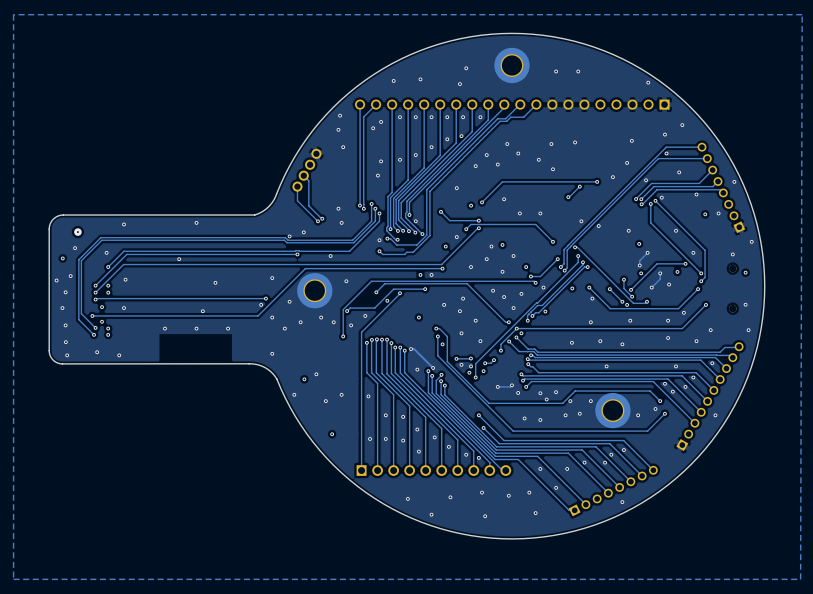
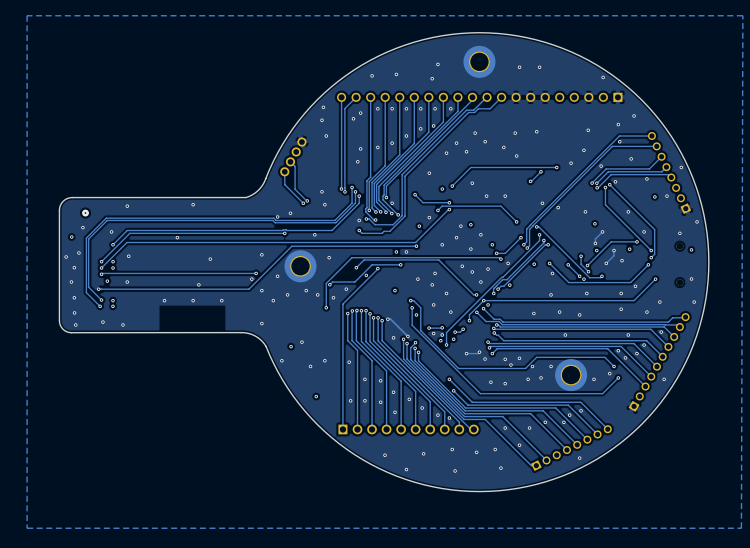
via: (102, 321) -> none

